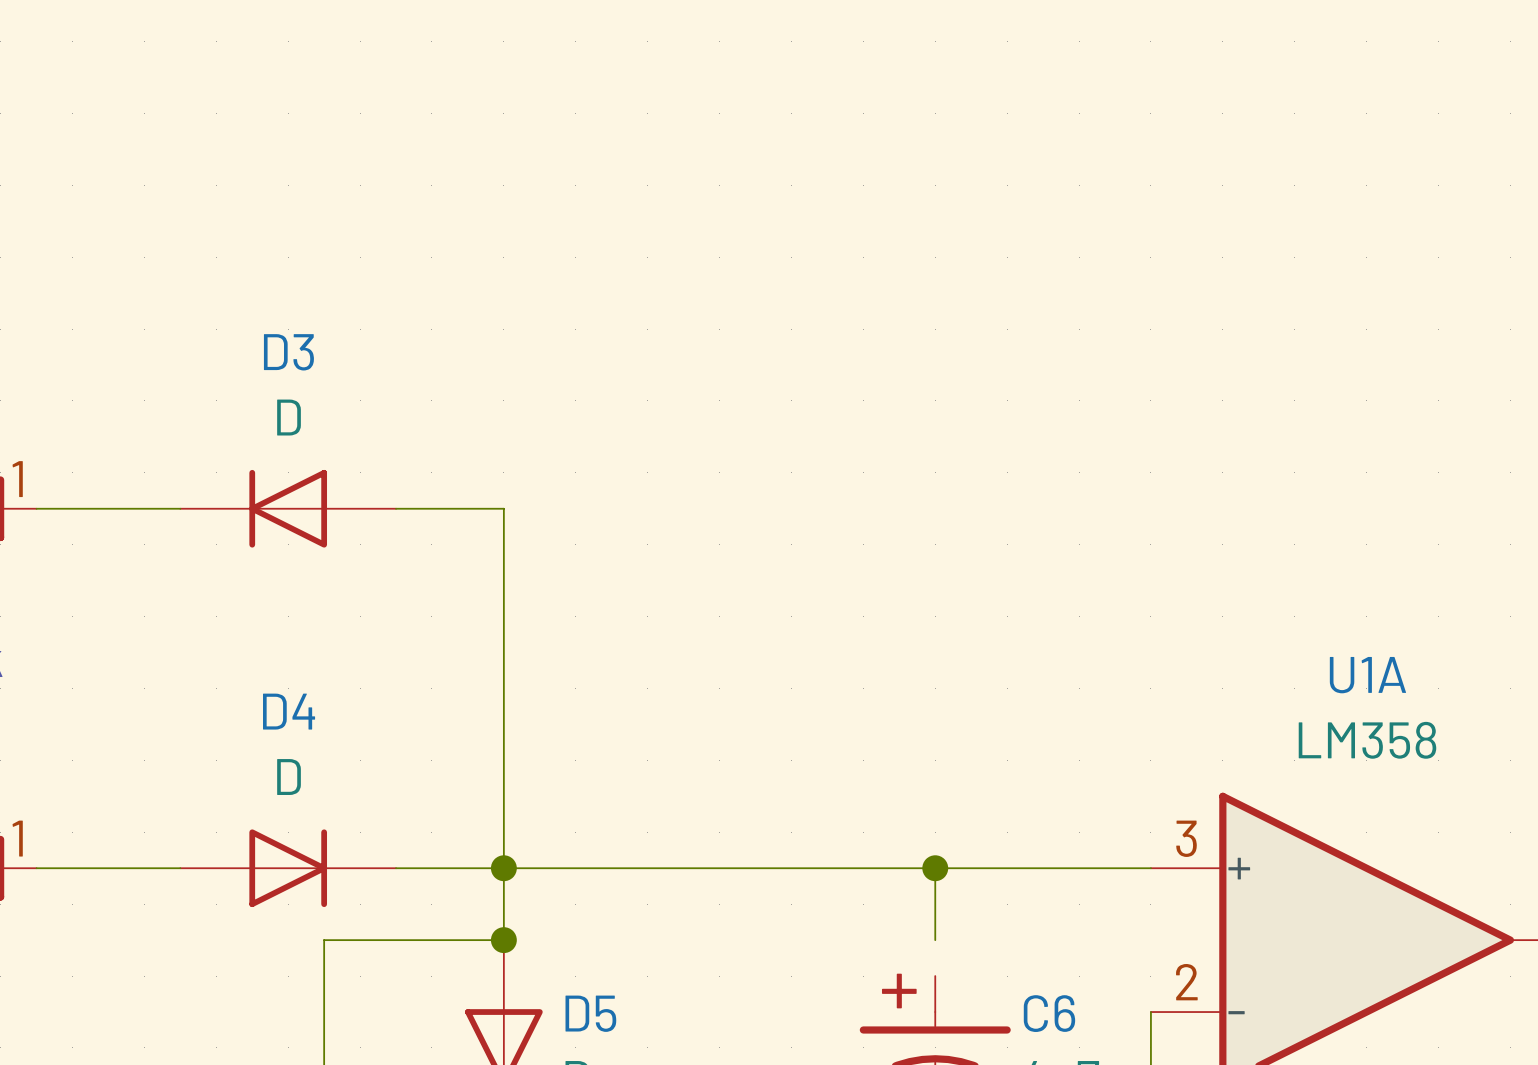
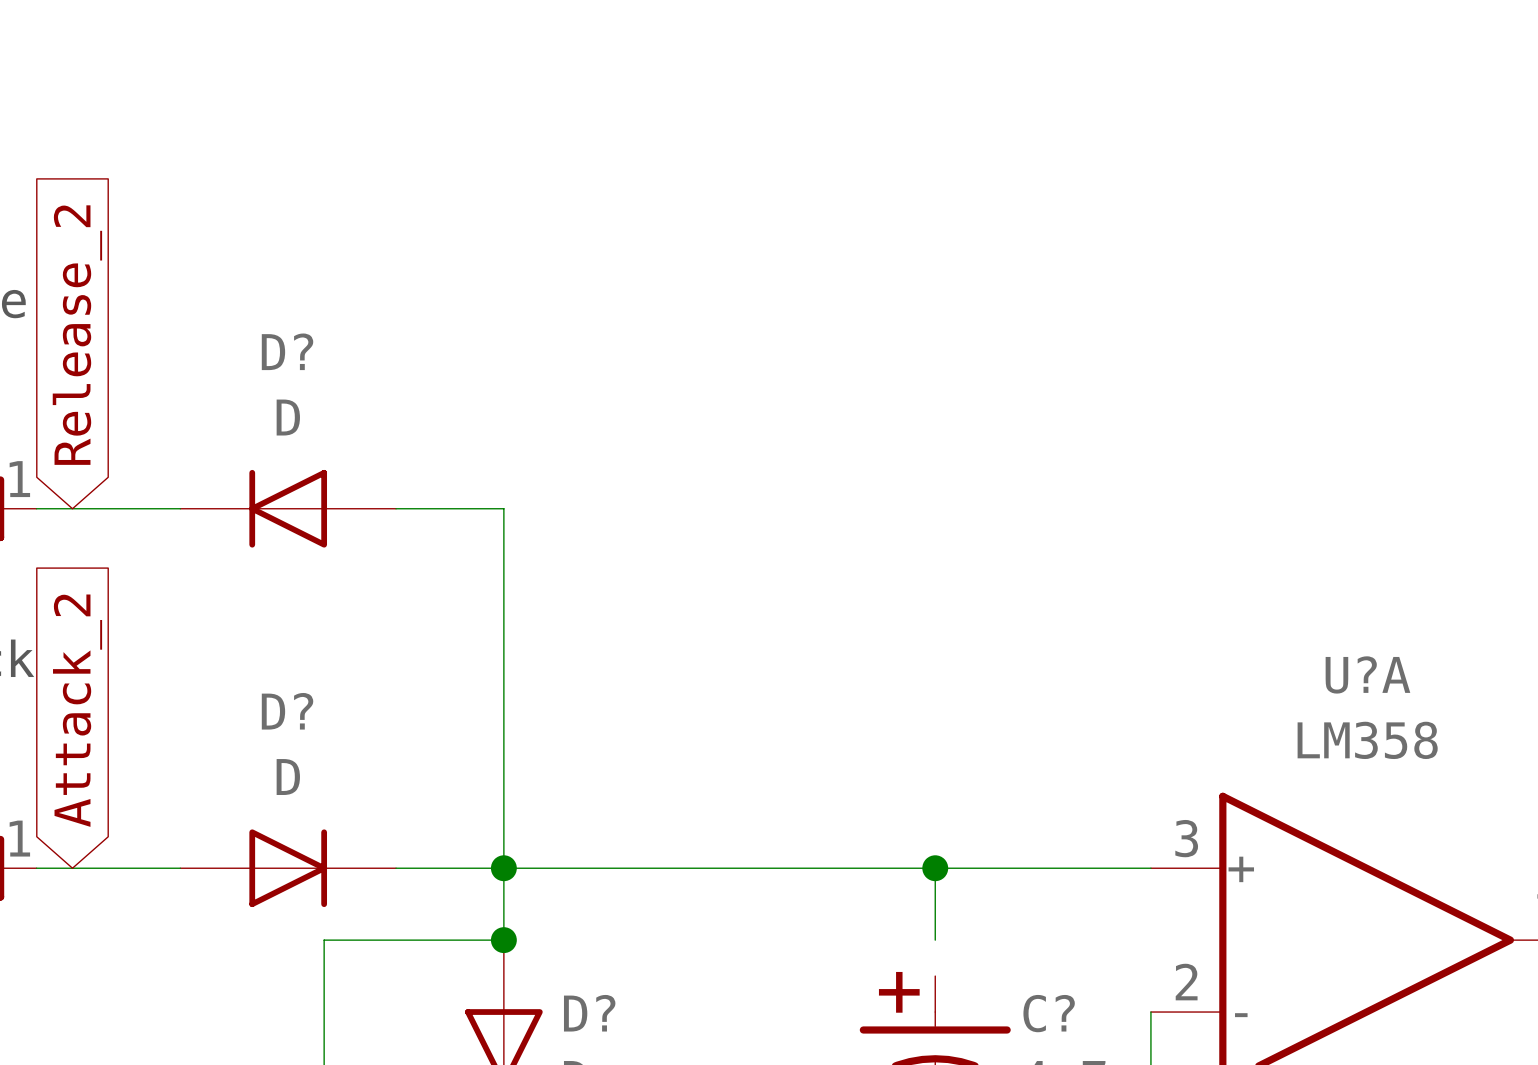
D3 name: D3 (288, 352) -> D? (287, 351)
global label: none -> Release_2 (77, 335)
U1A name: U1A (1367, 675) -> U?A (1367, 674)
D4 name: D4 (289, 711) -> D? (287, 711)
global label: none -> Attack_2 (77, 710)
D5 name: D5 (590, 1013) -> D? (589, 1013)
C6 name: C6 (1049, 1013) -> C? (1049, 1013)

